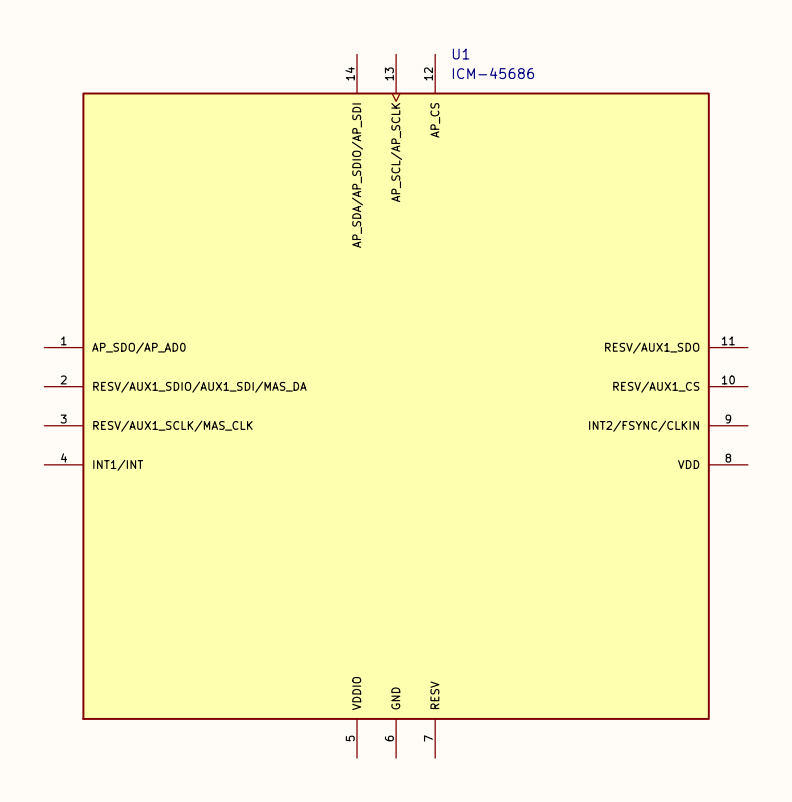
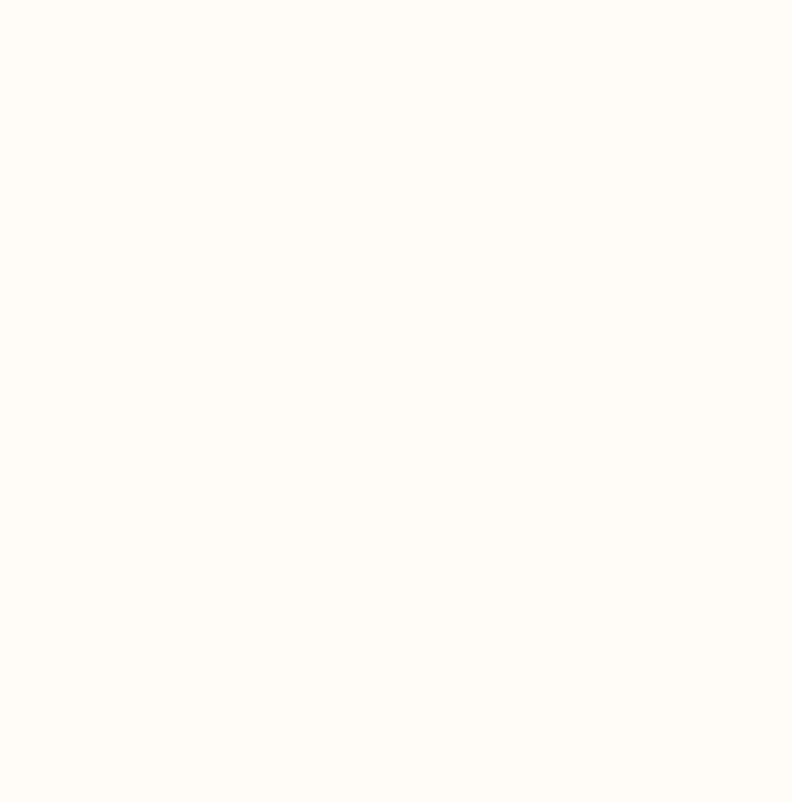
U1: ICM-45686 (396, 406) -> none

